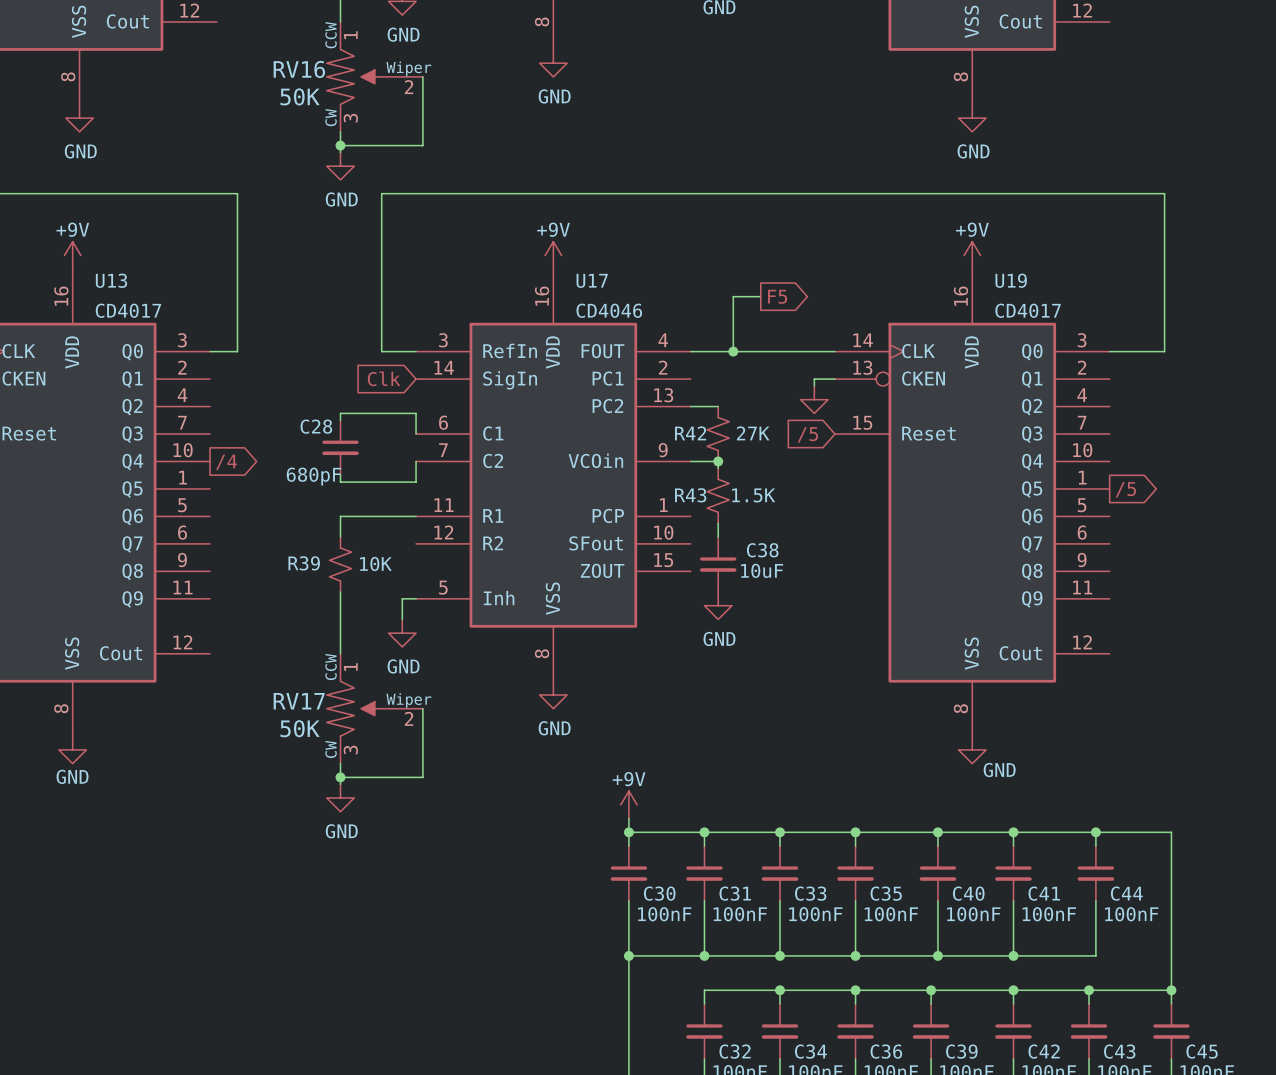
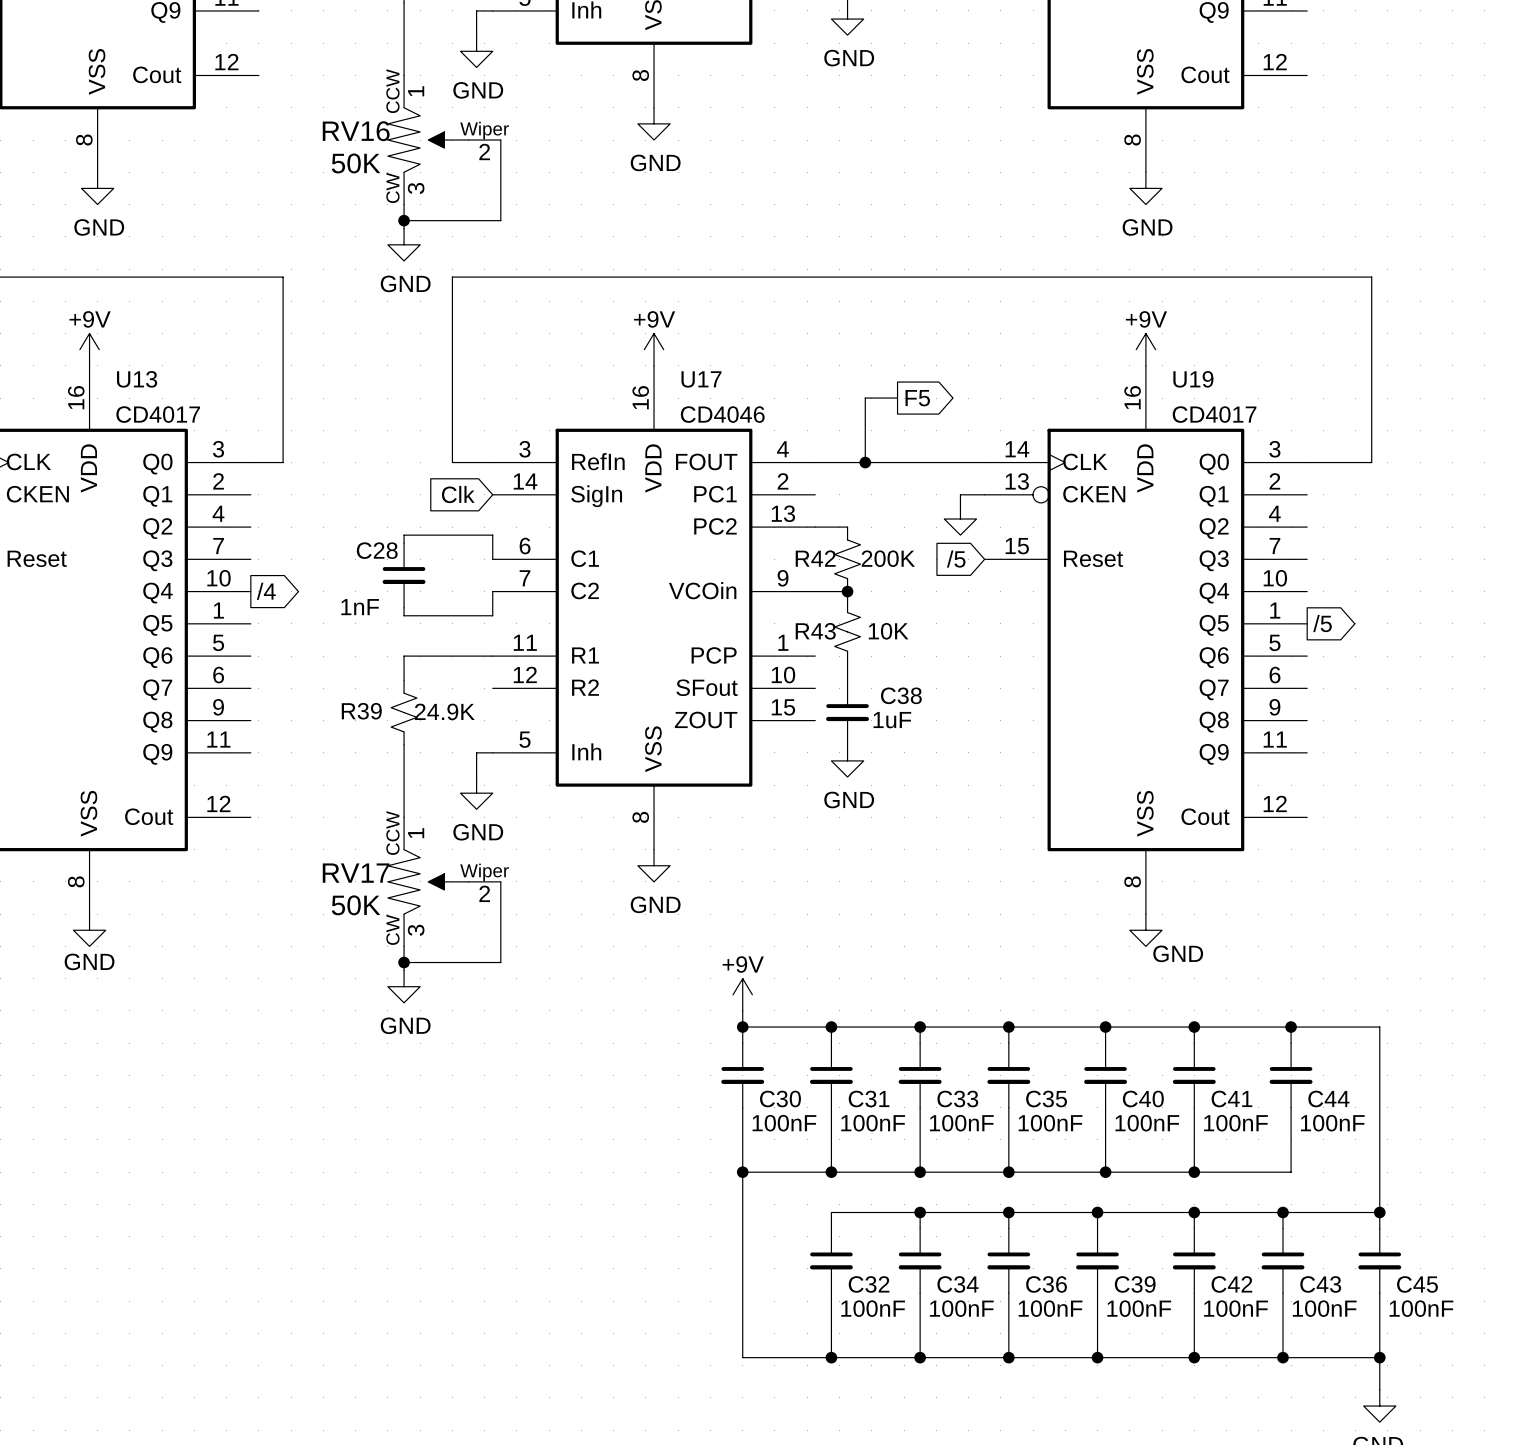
R42 value: 27K (753, 433) -> 200K (888, 558)
C28 value: 680pF (313, 476) -> 1nF (360, 607)
R43 value: 1.5K (753, 495) -> 10K (888, 631)
R39 value: 10K (375, 564) -> 24.9K (444, 711)
C38 value: 10uF (762, 570) -> 1uF (892, 720)

